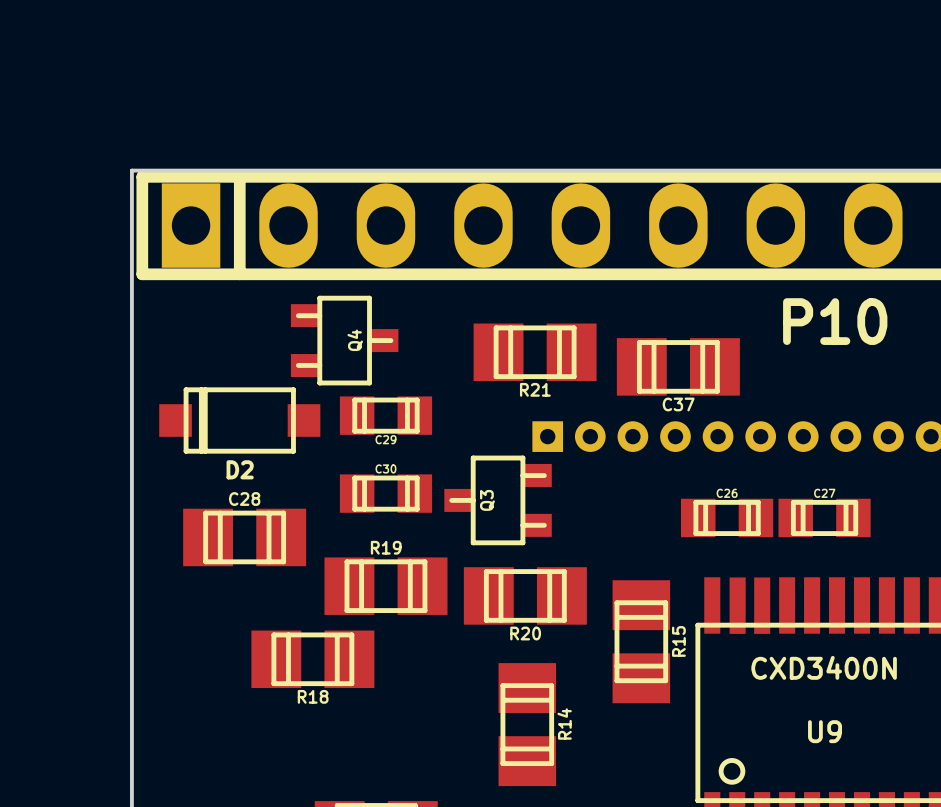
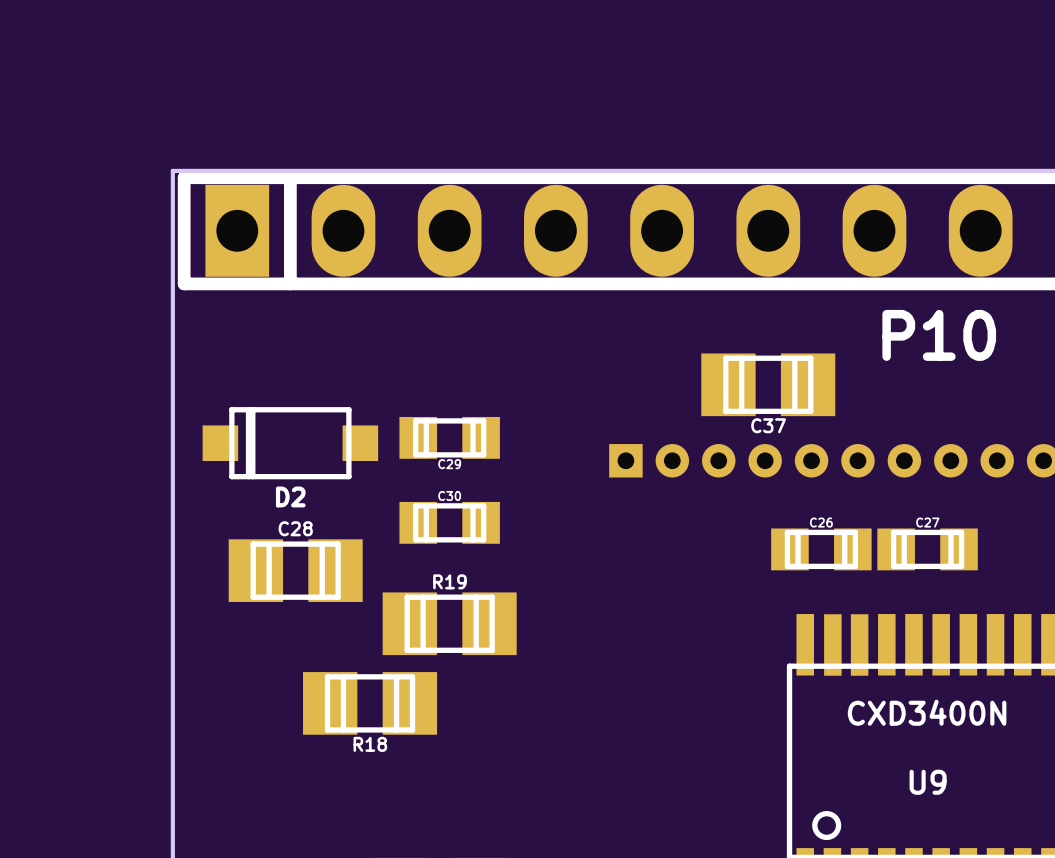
Q4: (344, 340) -> none
R21: (535, 352) -> none
Q3: (498, 500) -> none
R20: (525, 595) -> none
R15: (641, 641) -> none
R14: (527, 724) -> none

